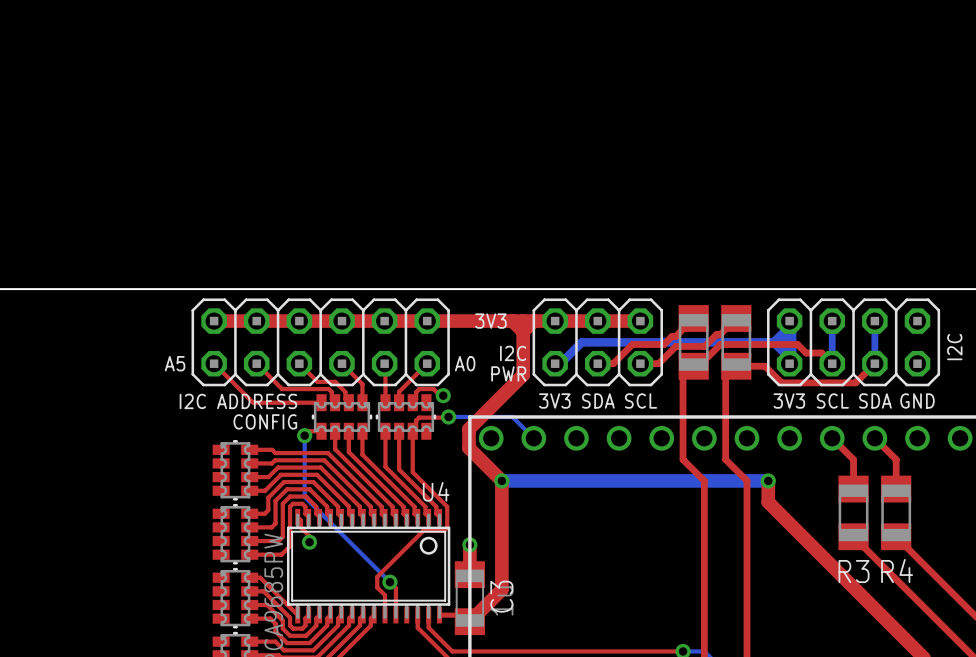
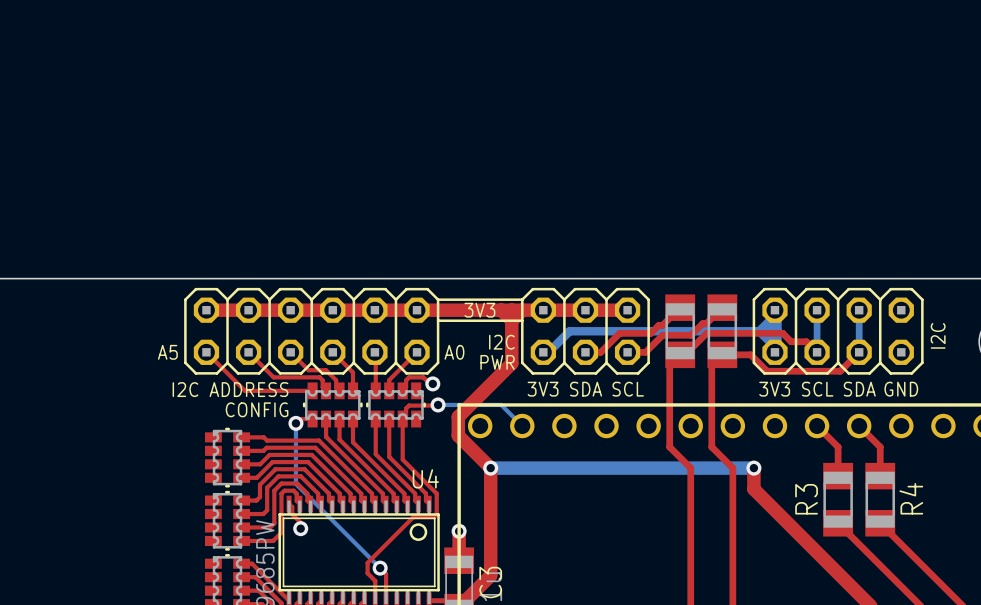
line: none -> (438, 299) (522, 299)
line: none -> (438, 320) (522, 320)
R3 name rotation: 0° (854, 571) -> 90° counterclockwise (806, 499)
R3 name position: R3 (854, 571) -> R3 (806, 499)
R4 name rotation: 0° (897, 571) -> 90° counterclockwise (911, 498)
R4 name position: R4 (897, 571) -> R4 (911, 498)

